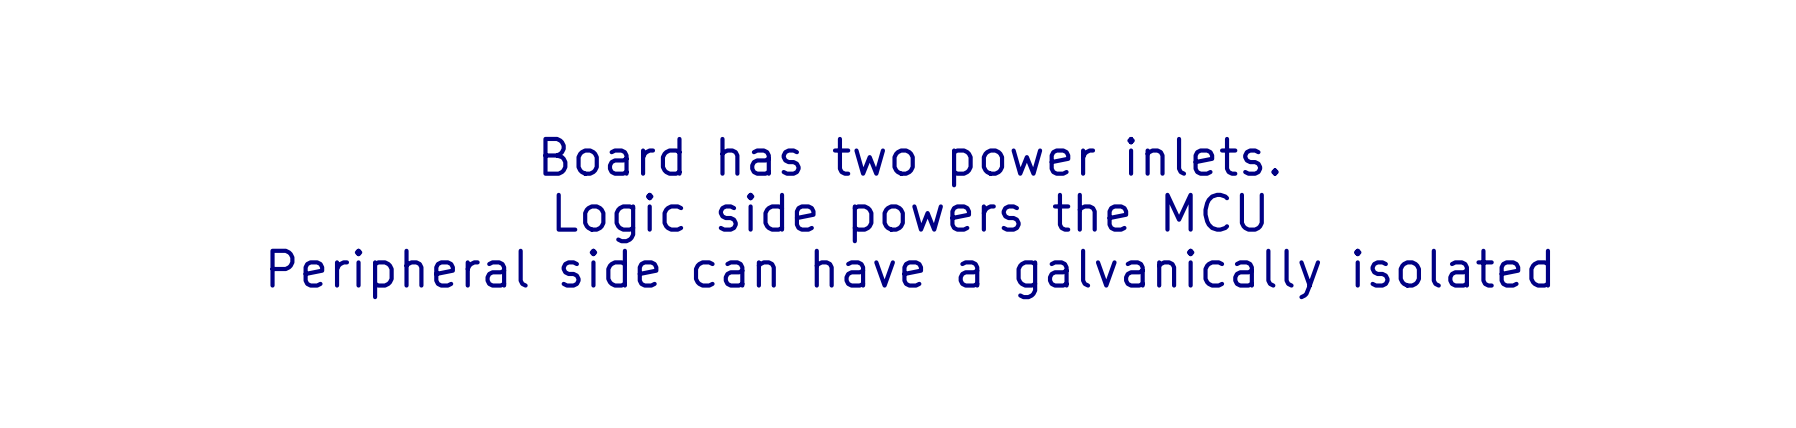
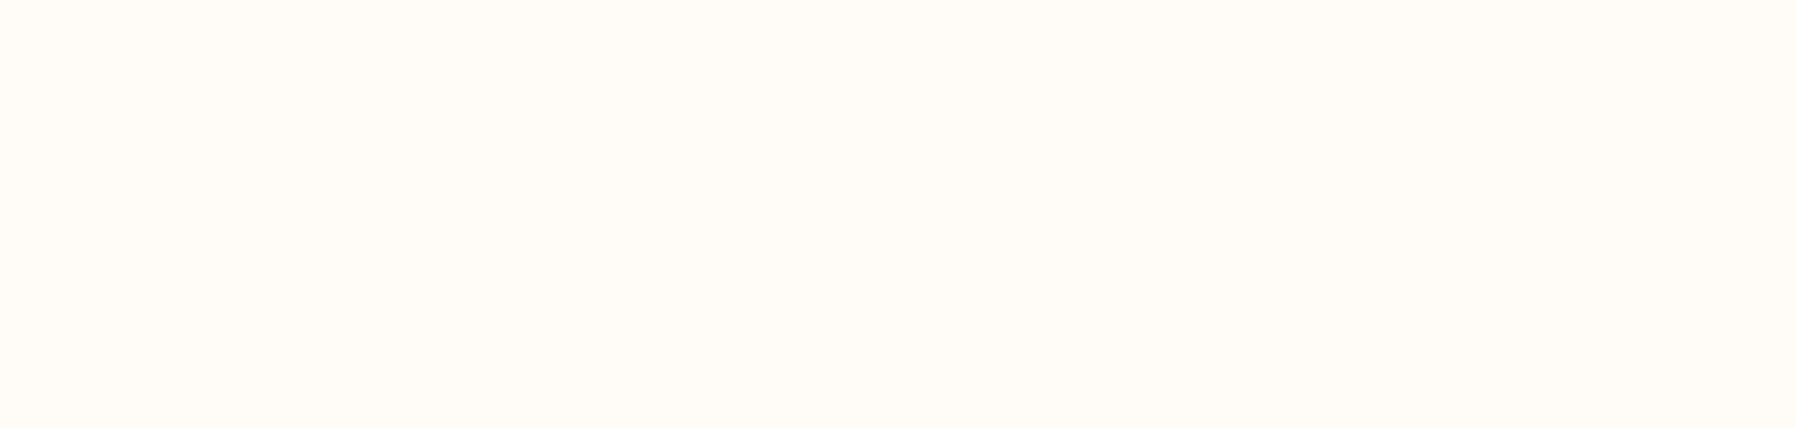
text: Board has two power inlets. (911, 162) -> none
text: Logic side powers the MCU (910, 218) -> none
text: Peripheral side can have a galvanically isolated (910, 273) -> none

